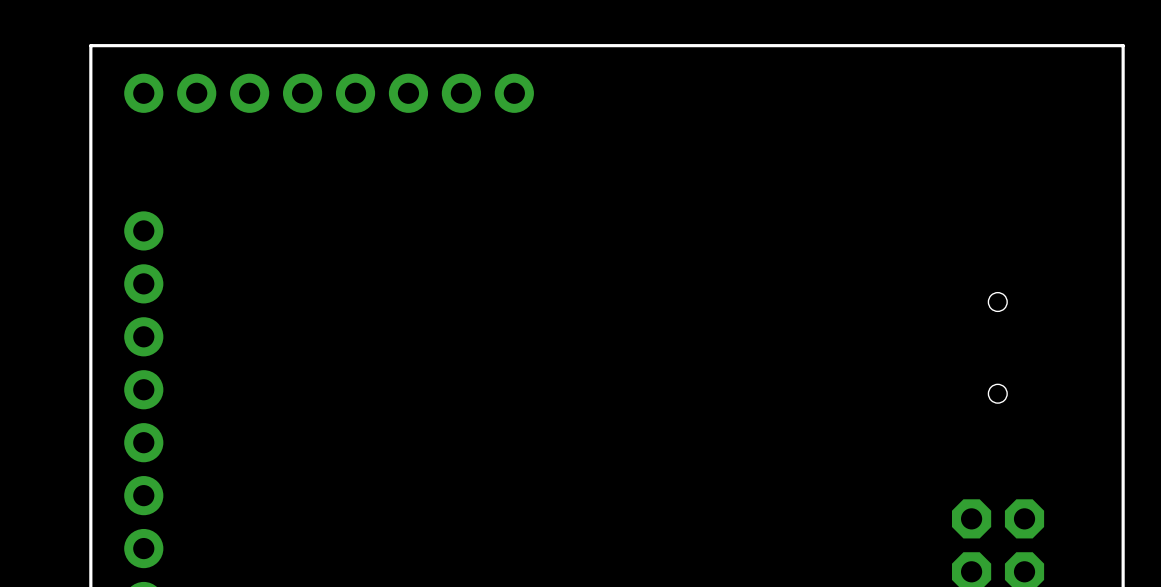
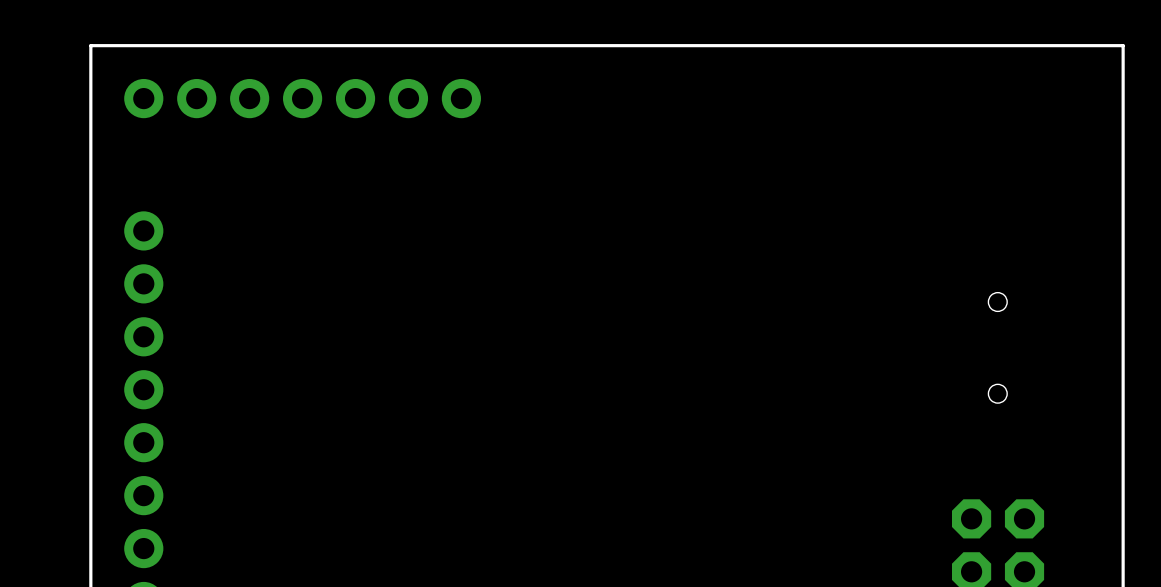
part: (329, 93) -> none
part: none -> (302, 98)

